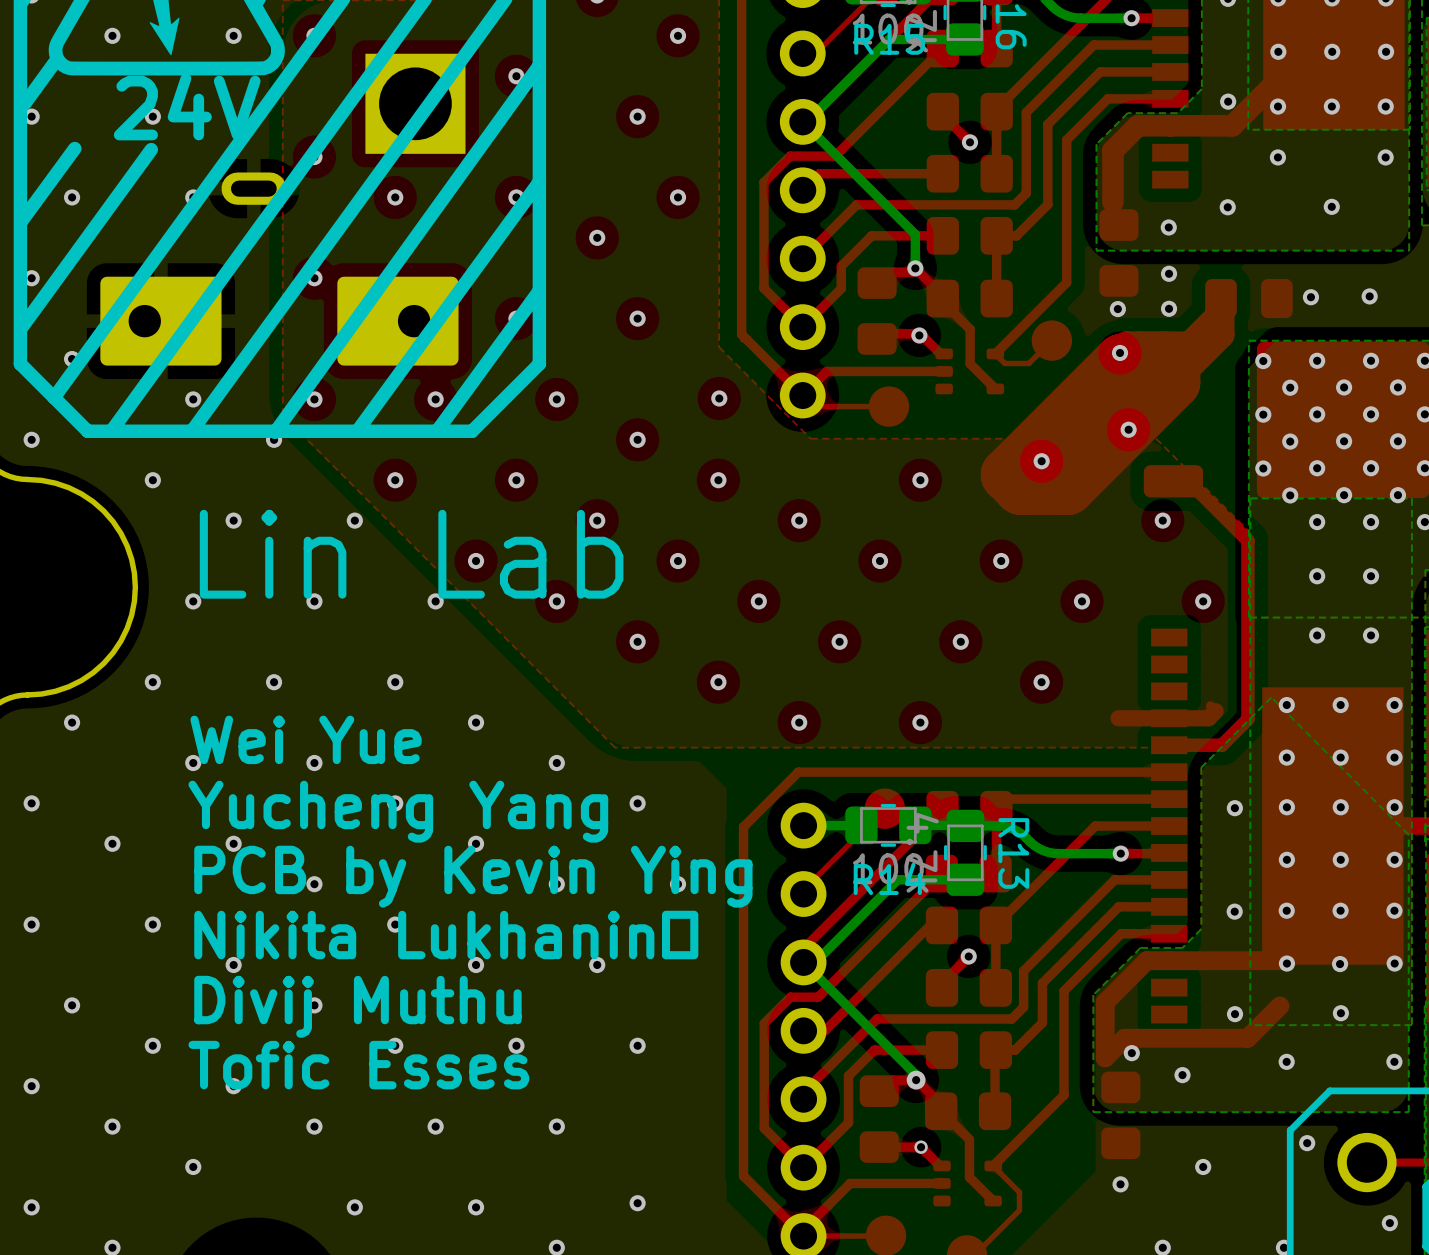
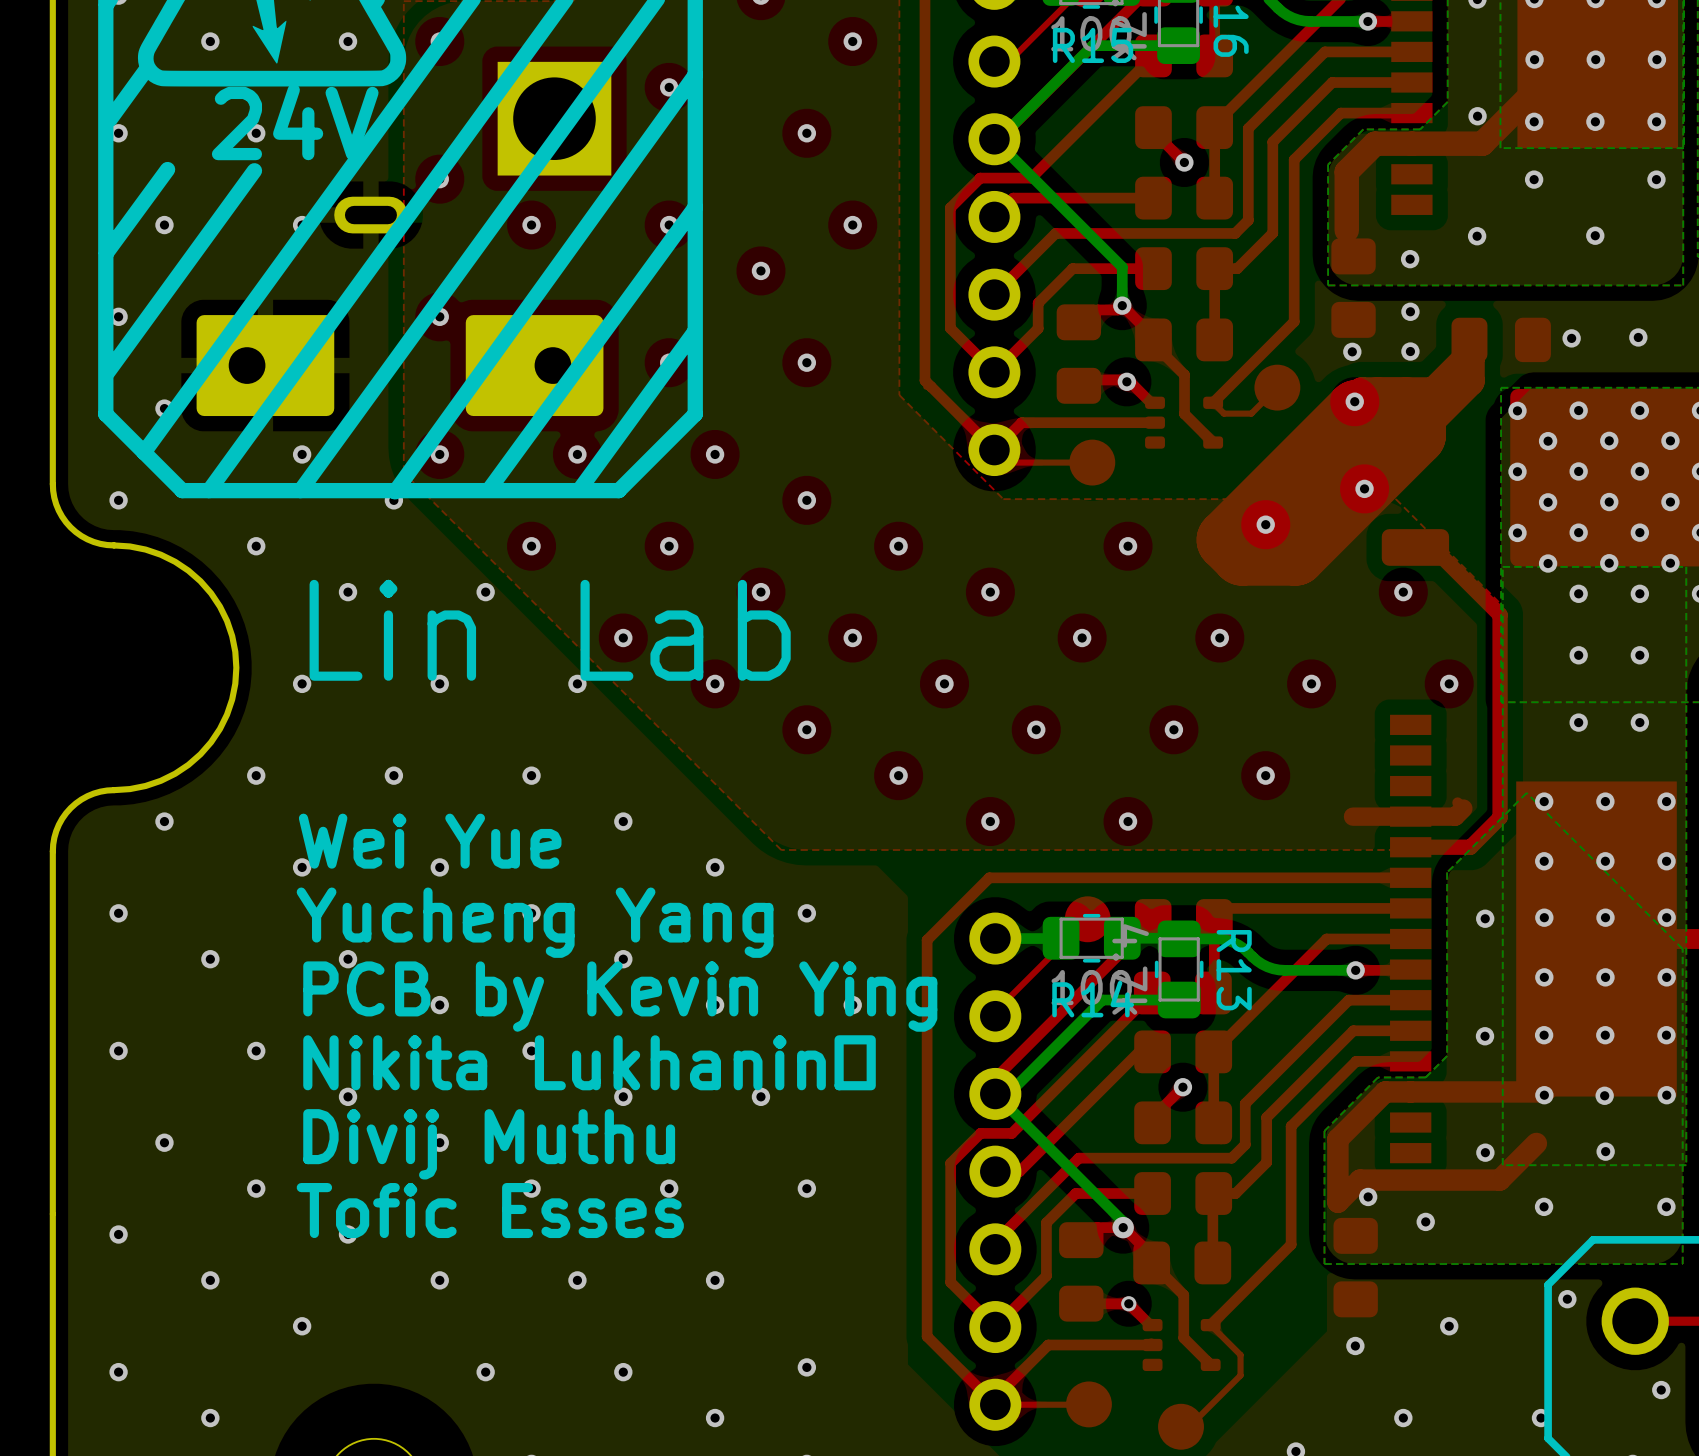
via: (719, 398) -> none

